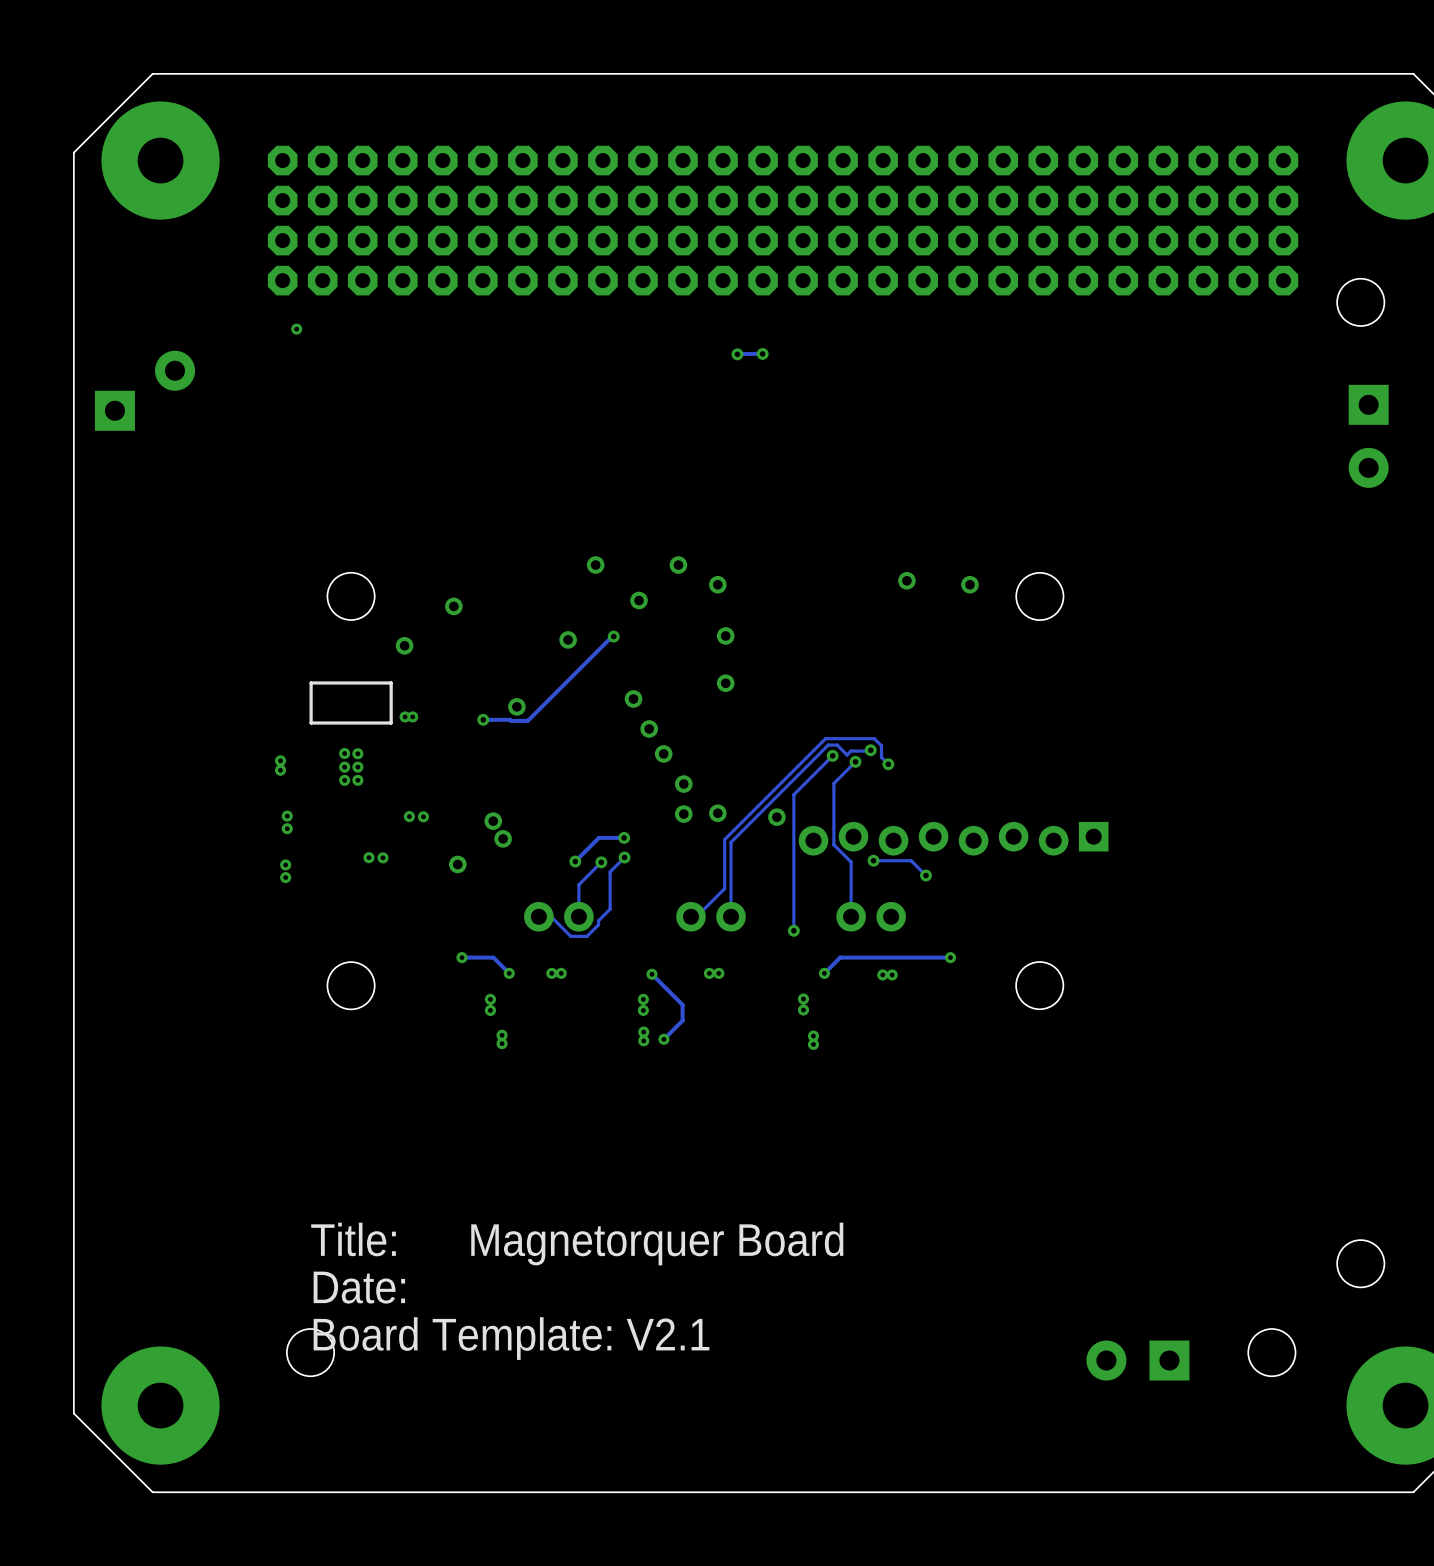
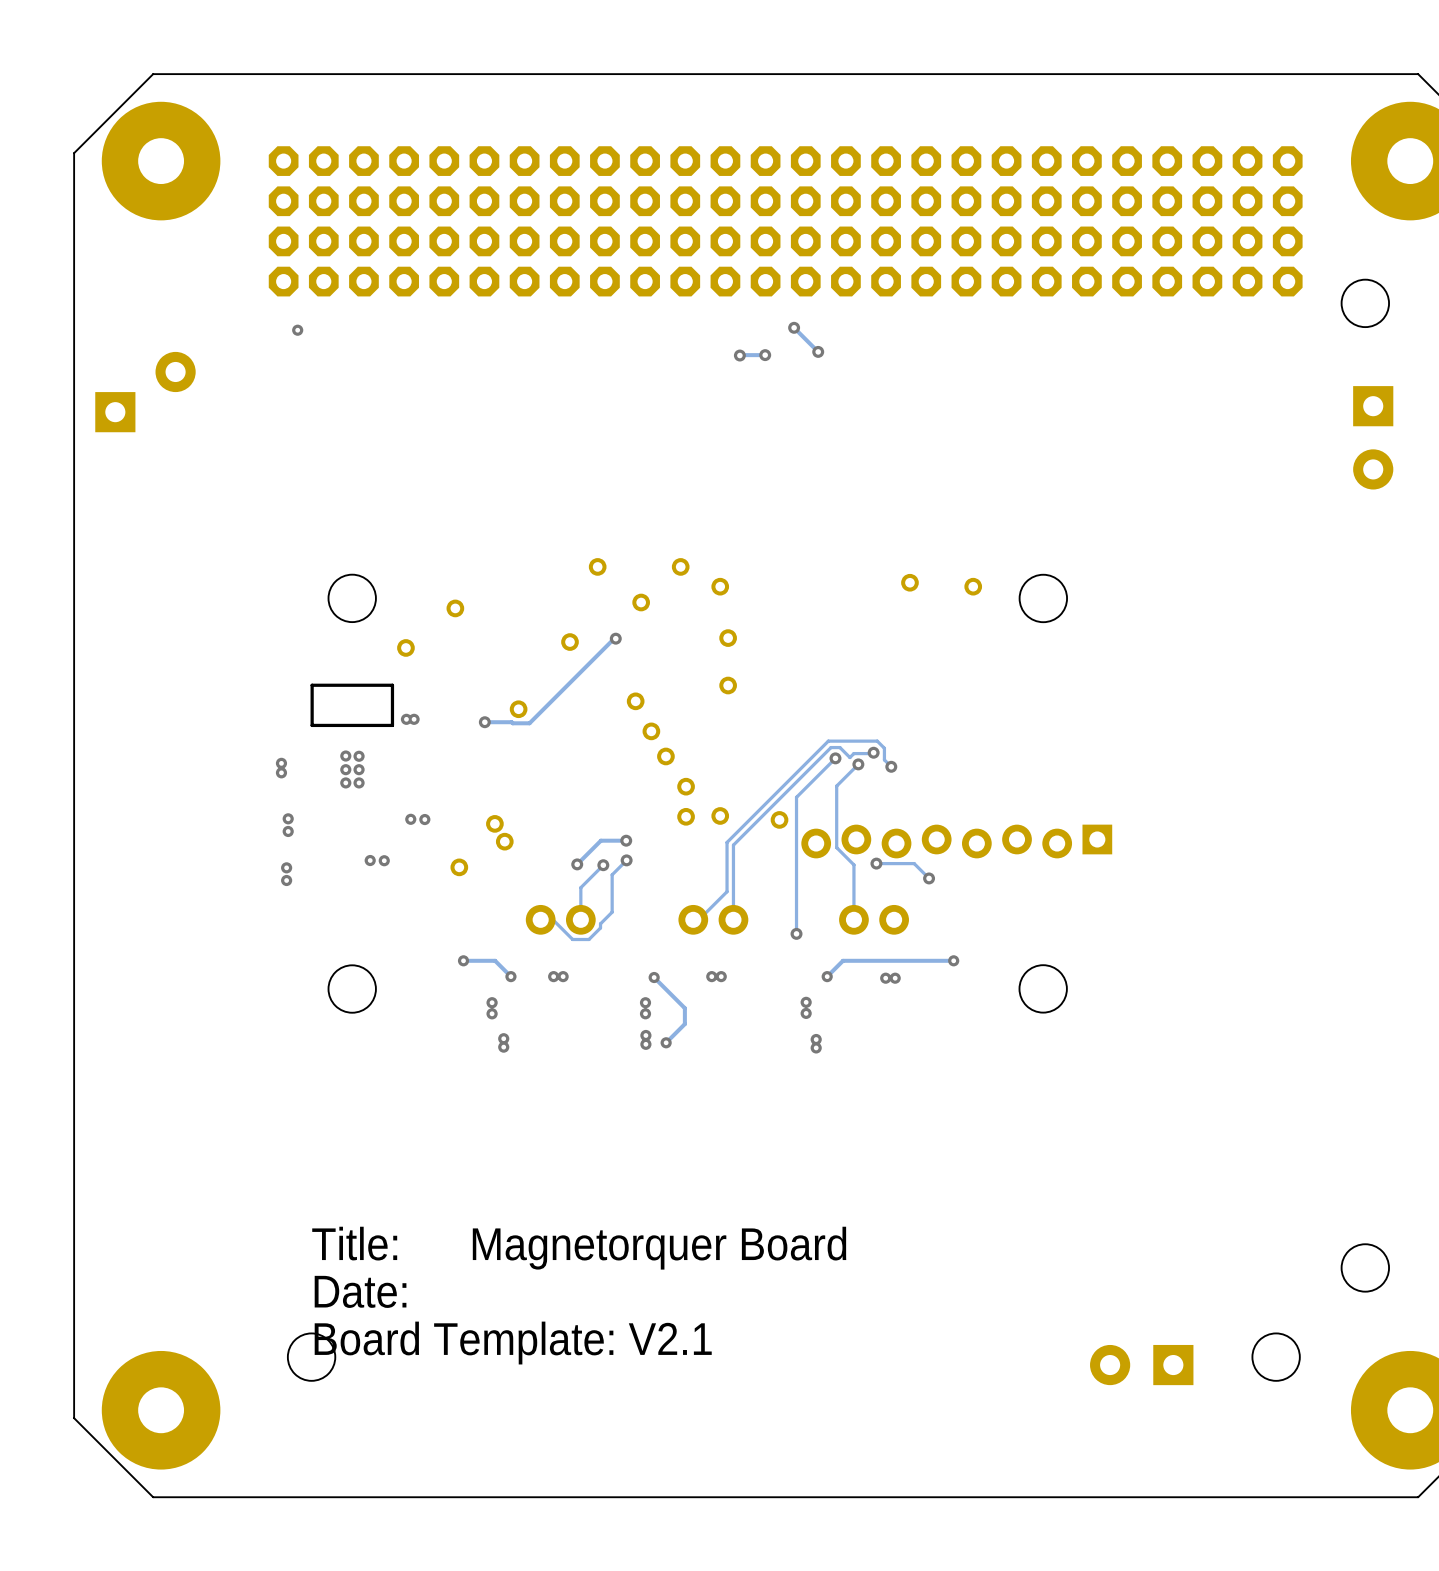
track: none -> (794, 327) (818, 351)
via: none -> (794, 327)
via: none -> (818, 351)

